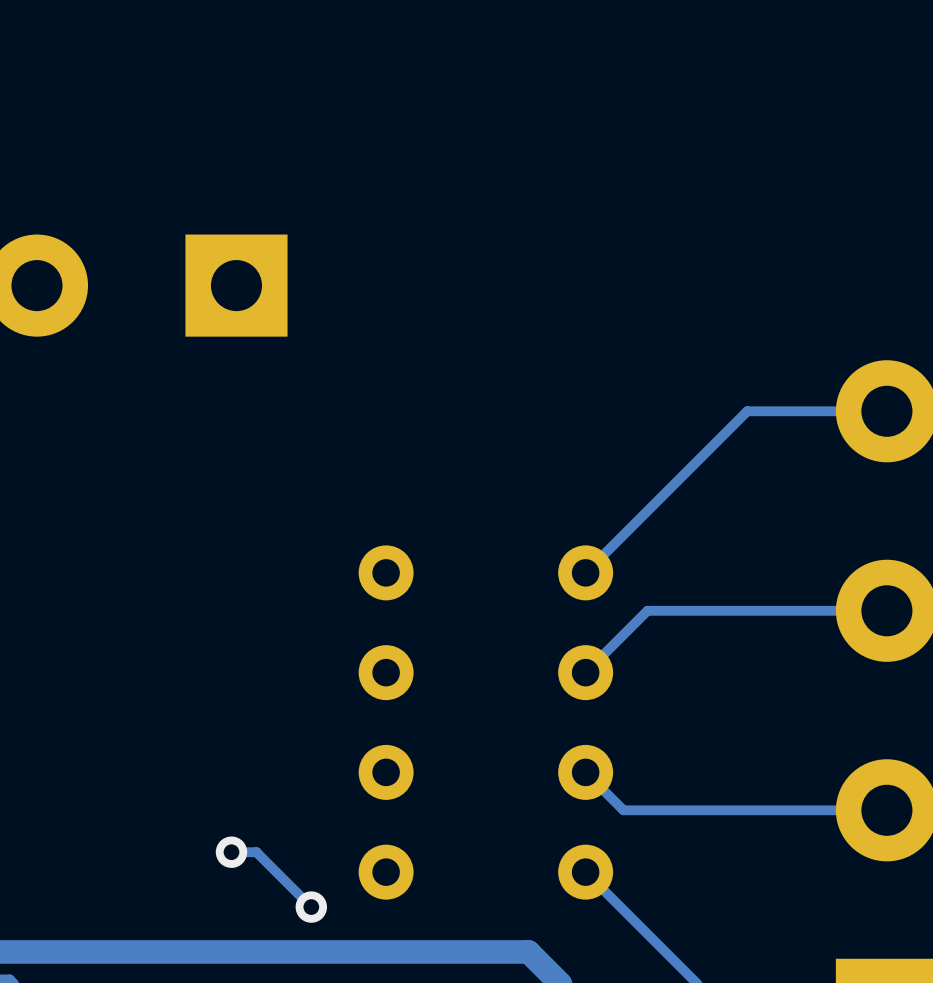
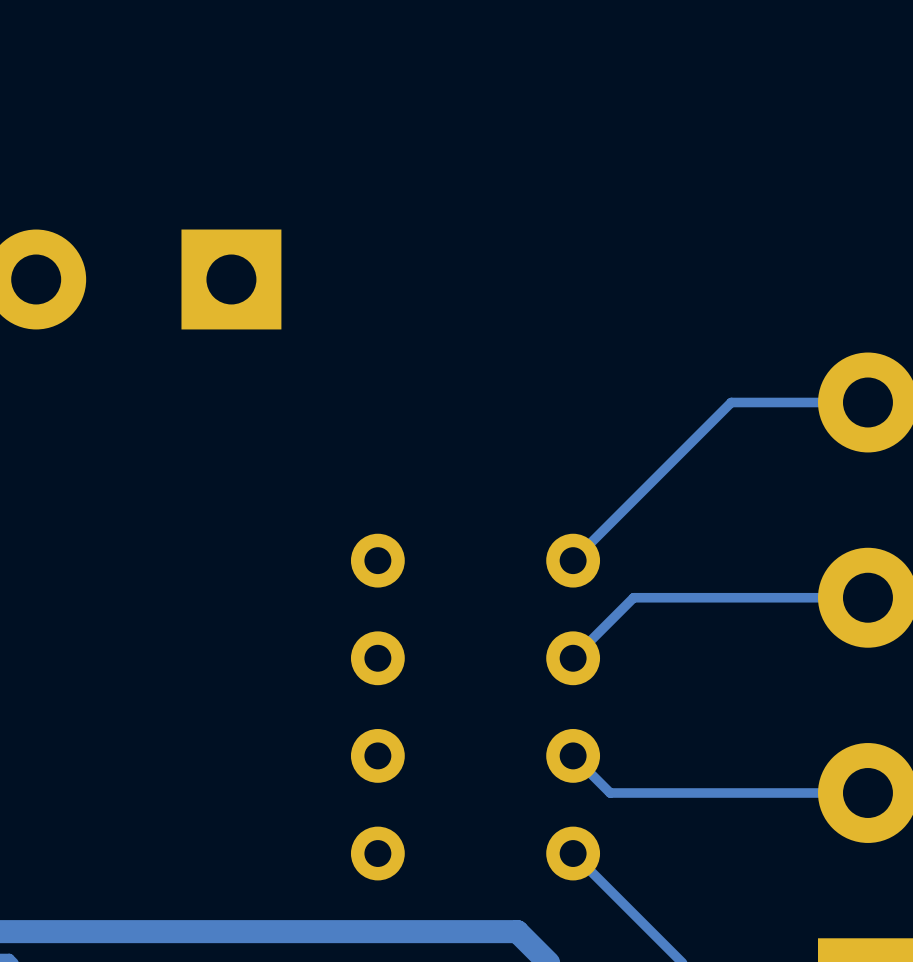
track: (231, 852) (256, 852) (311, 907) -> none
via: (231, 852) -> none
via: (311, 907) -> none

